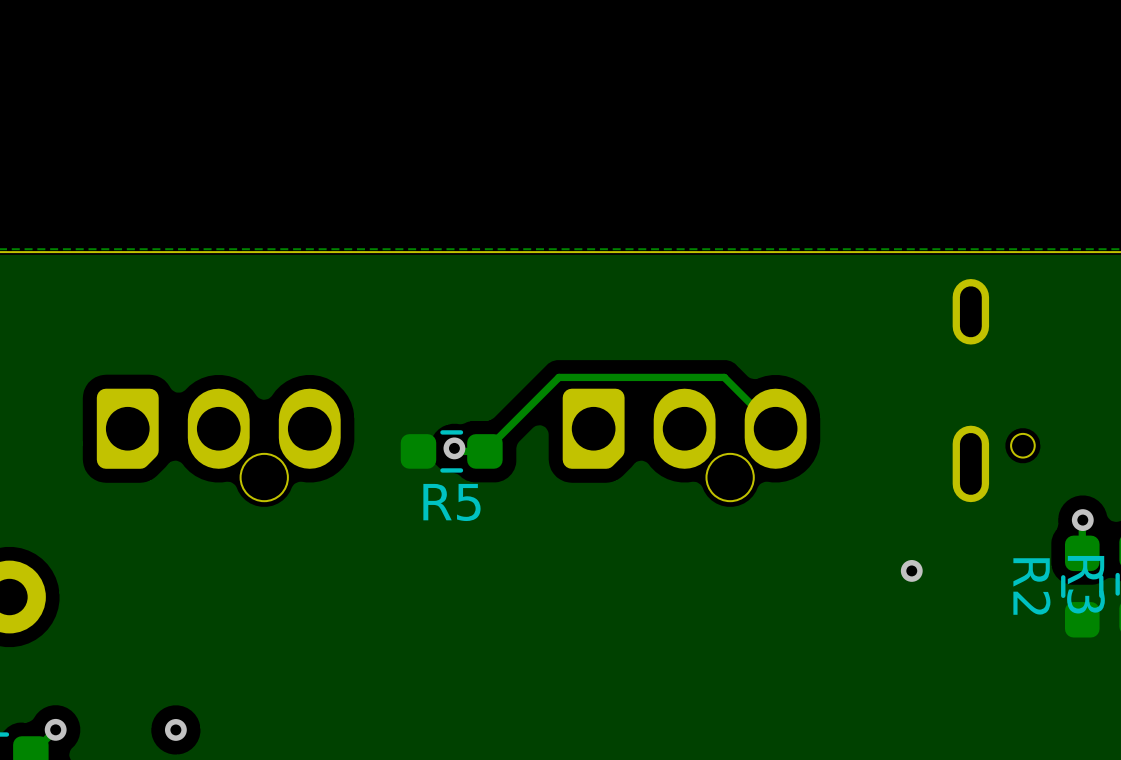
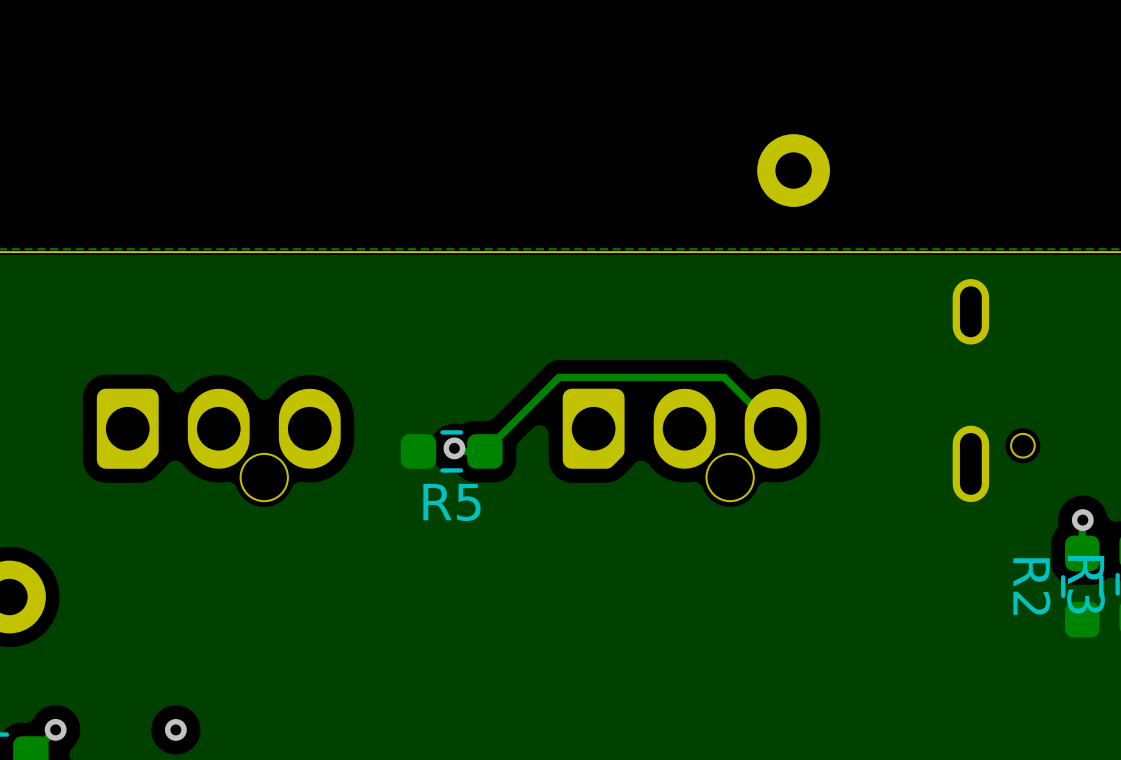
part: none -> (793, 170)
via: (911, 570) -> none

